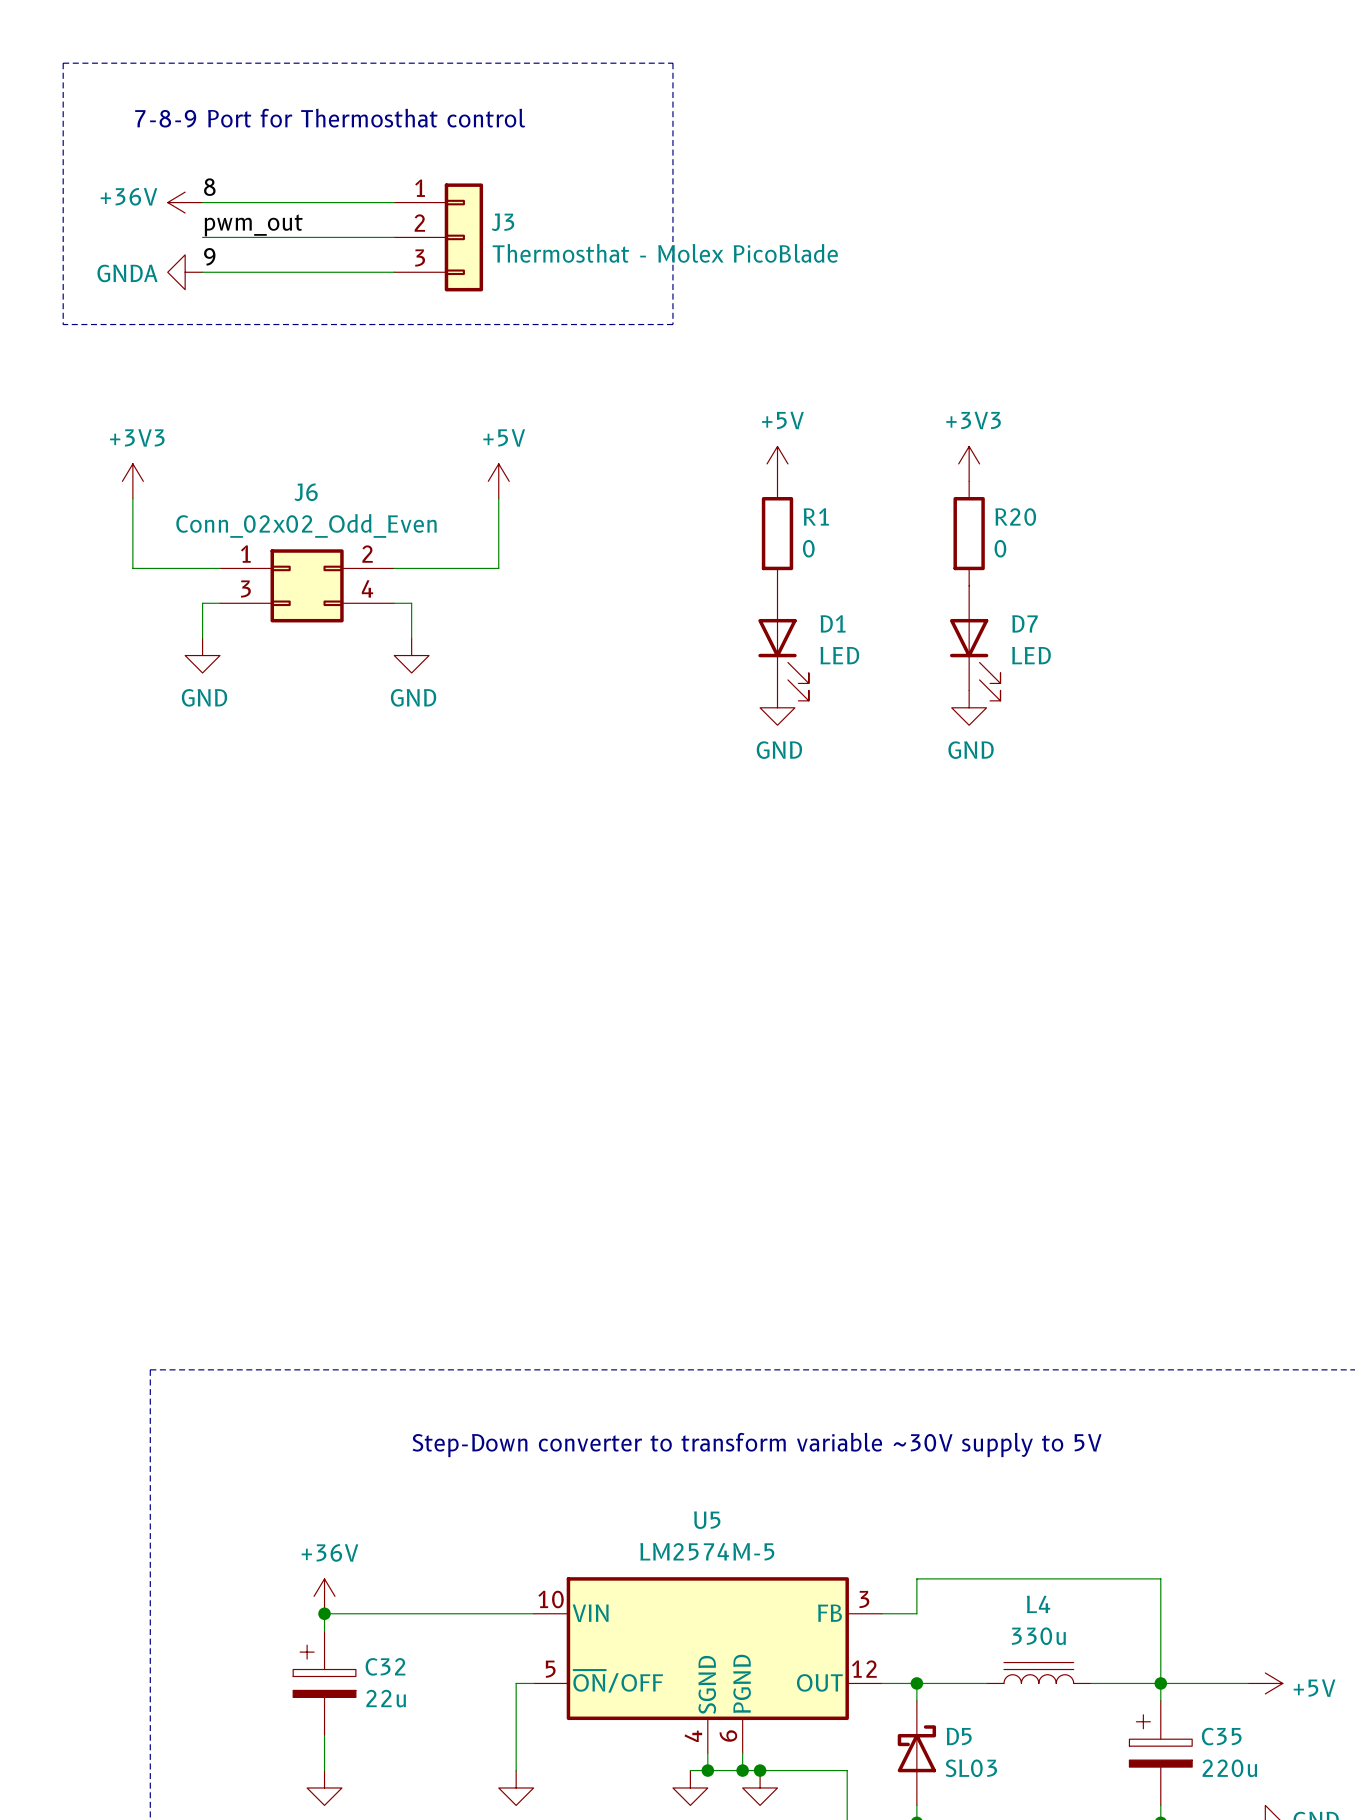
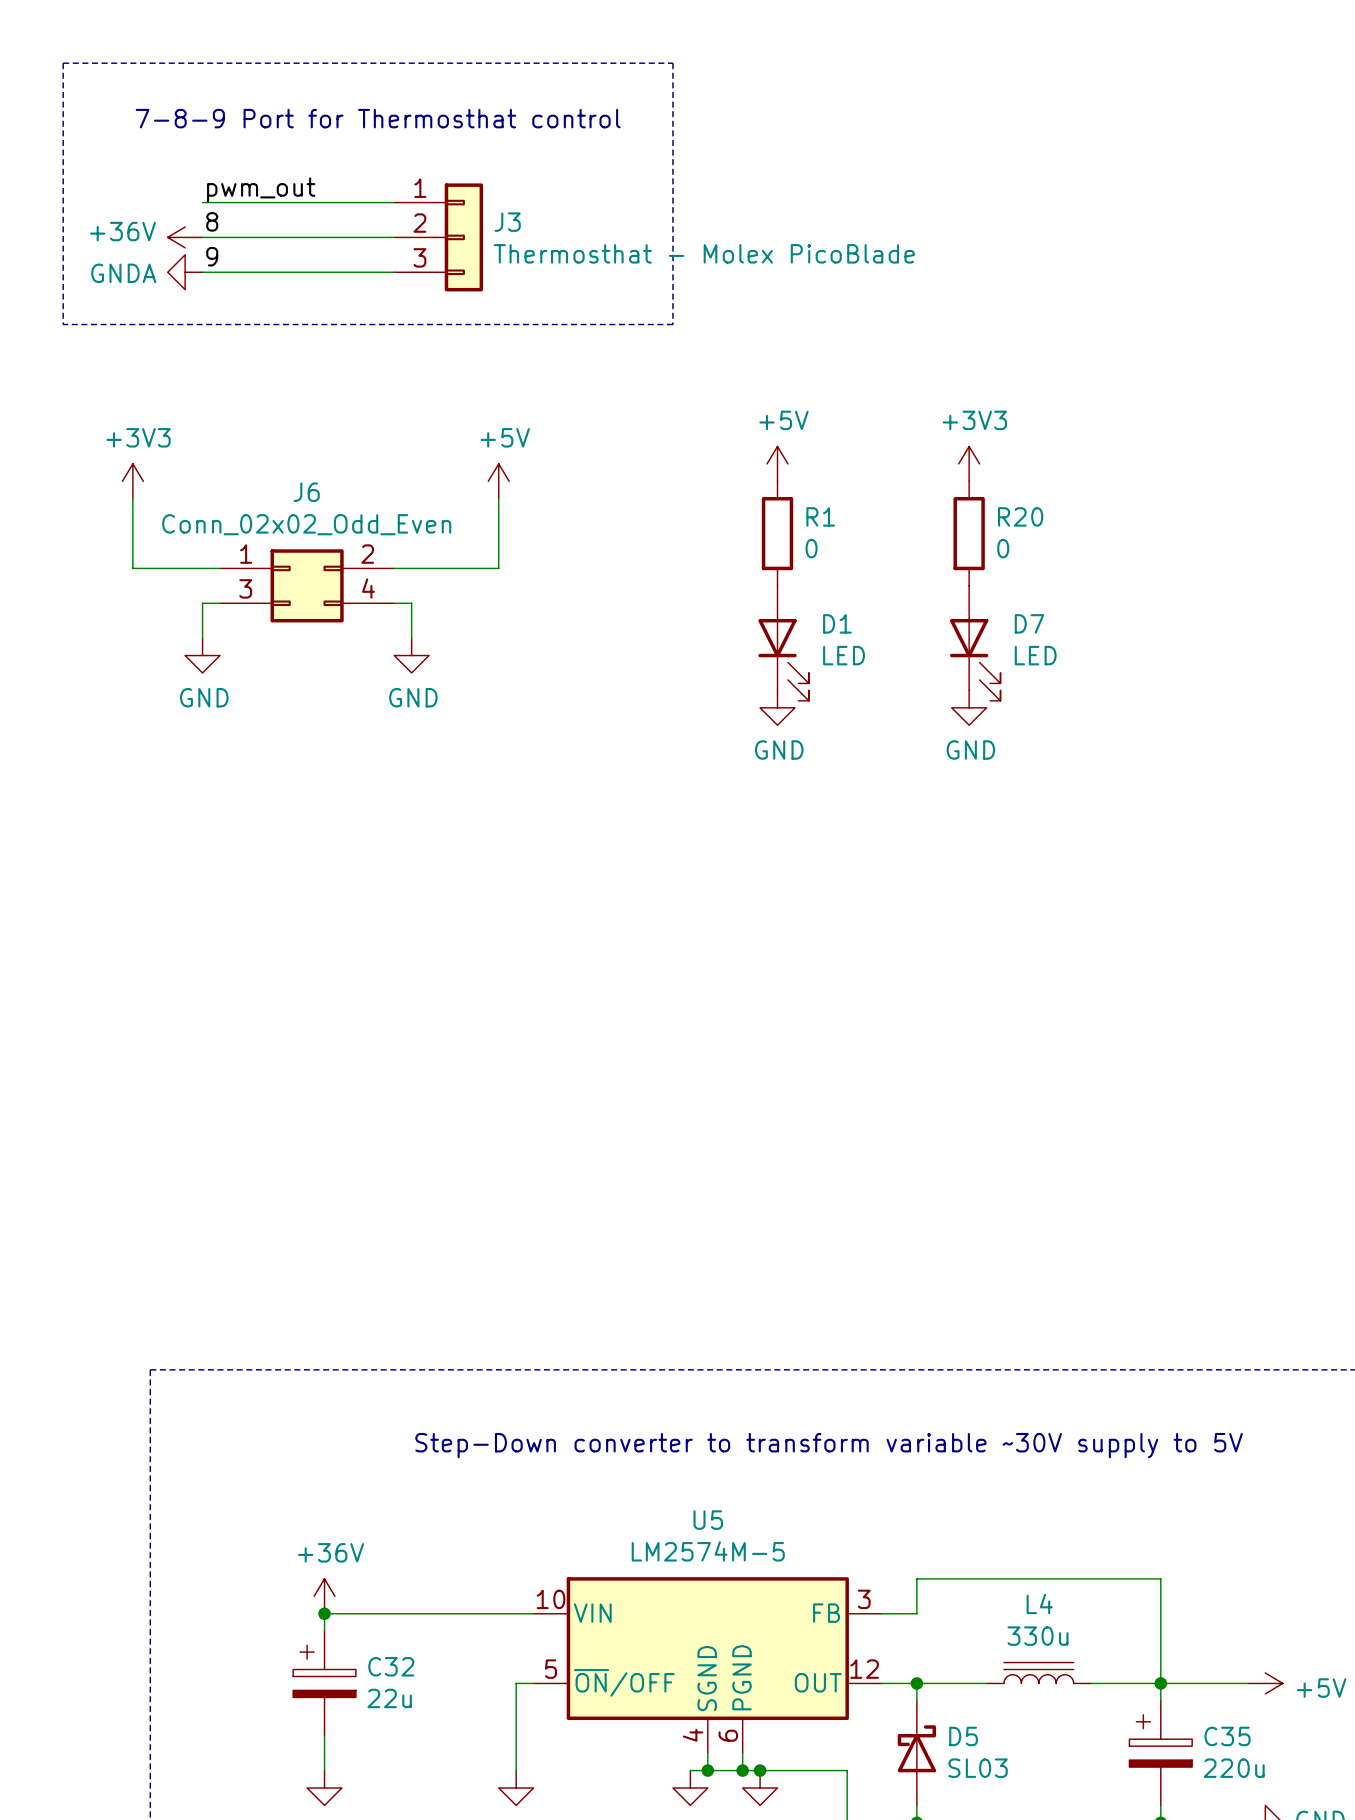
label: 8 (209, 187) -> pwm_out (261, 189)
power symbol position: +36V (185, 202) -> +36V (185, 237)
label: pwm_out (253, 225) -> 8 (212, 221)

